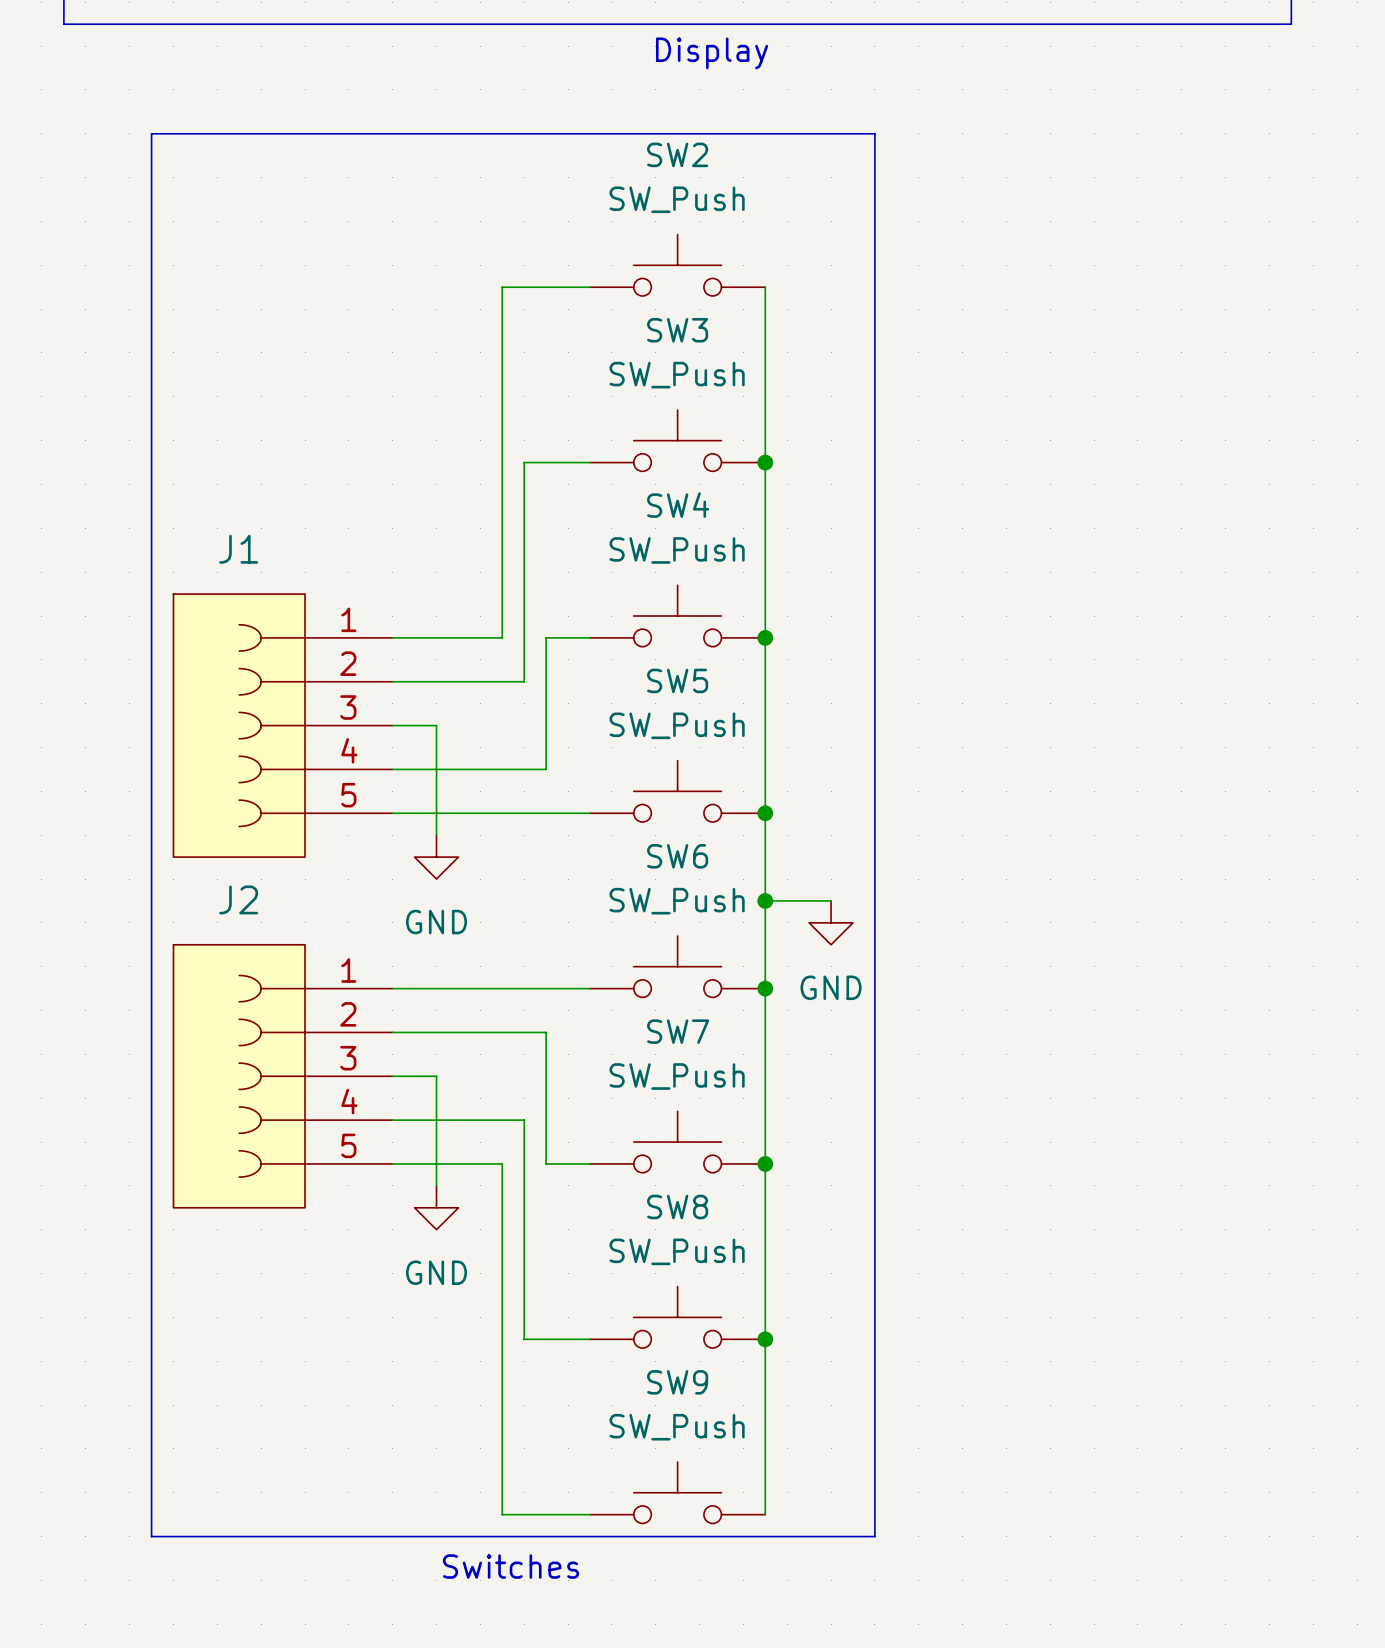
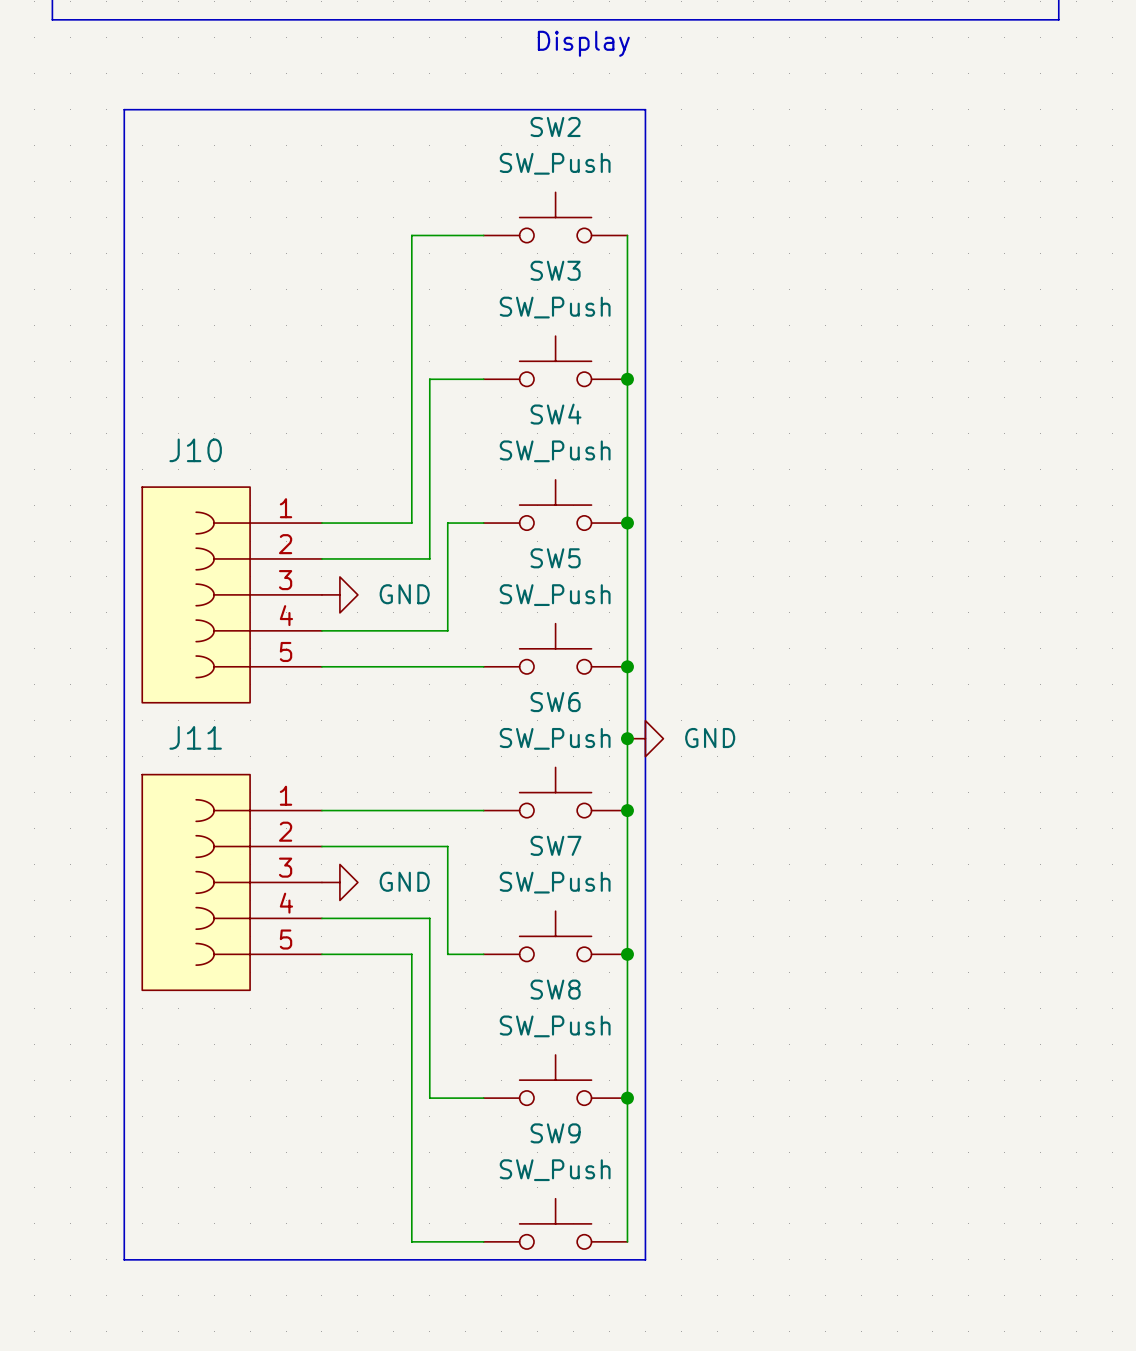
line: (787, 133) (874, 133) (874, 1536) (787, 1536) -> (645, 109) (645, 1259)
J1 name: J1 (238, 549) -> J10 (195, 450)
wire: (392, 725) (436, 725) (436, 835) -> none
power symbol: none -> GND (339, 594)
power symbol: GND (436, 857) -> none
J2 name: J2 (238, 899) -> J11 (195, 737)
wire: (765, 900) (831, 900) -> none
power symbol rotation: 0° (831, 922) -> 90° counterclockwise (645, 738)
power symbol position: GND (831, 922) -> GND (645, 738)
wire: (392, 1076) (436, 1076) (436, 1185) -> none
power symbol: none -> GND (339, 882)
power symbol: GND (436, 1207) -> none
text: Switches (511, 1566) -> none

